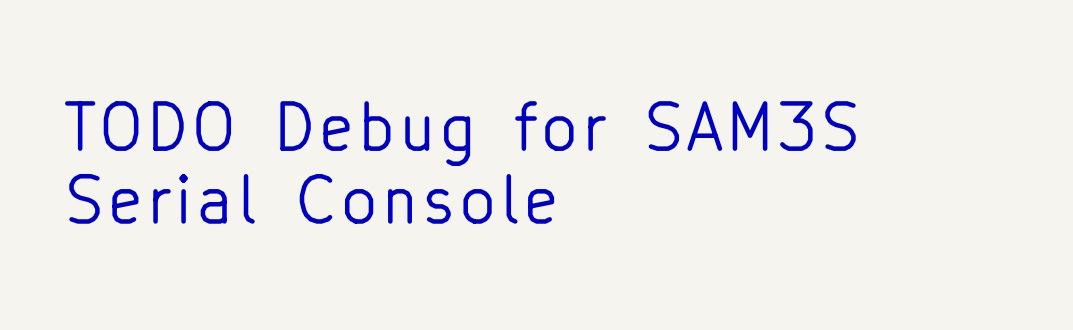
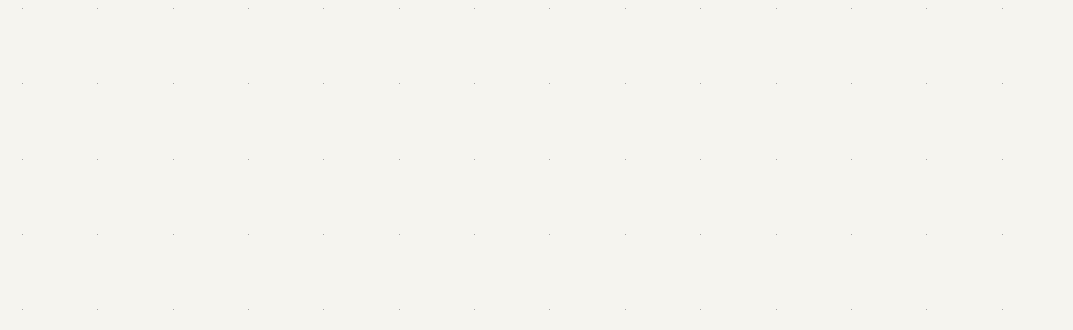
text: TODO Debug for SAM3S (460, 133) -> none
text: Serial Console (311, 198) -> none

